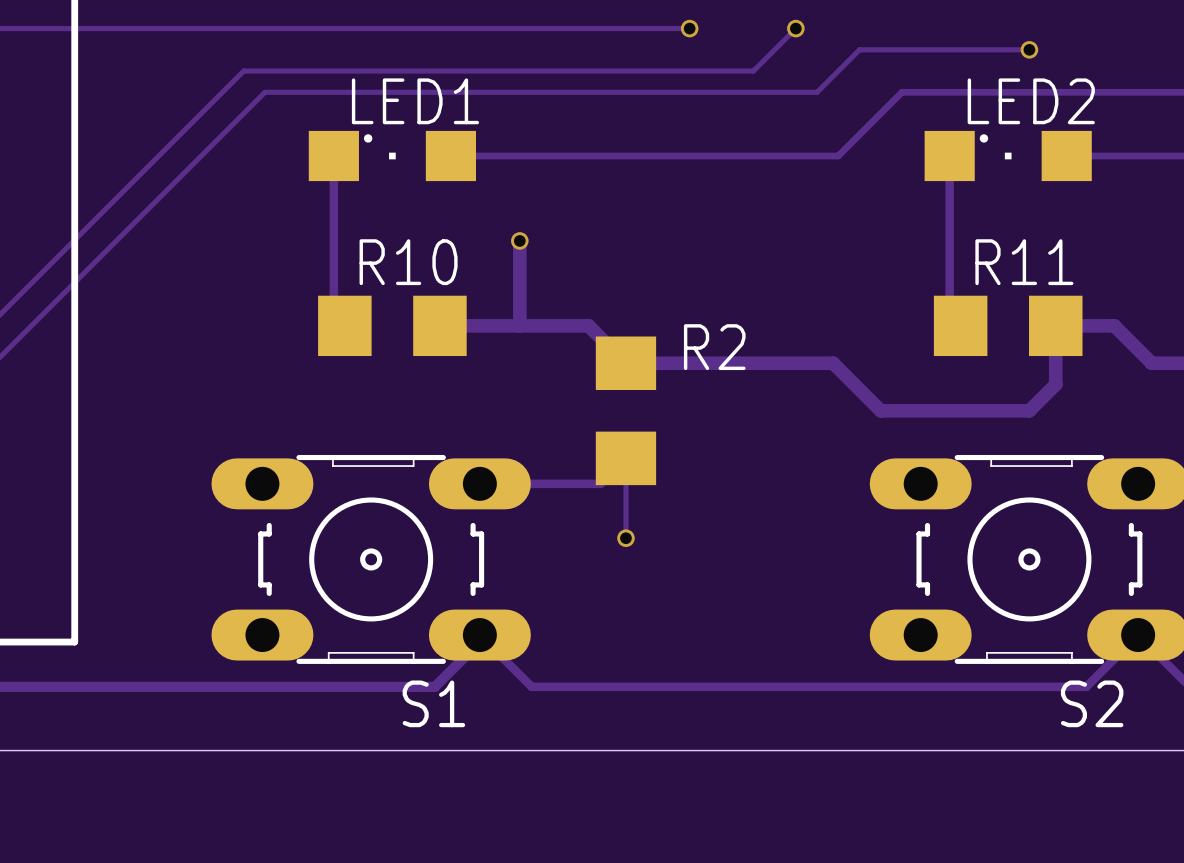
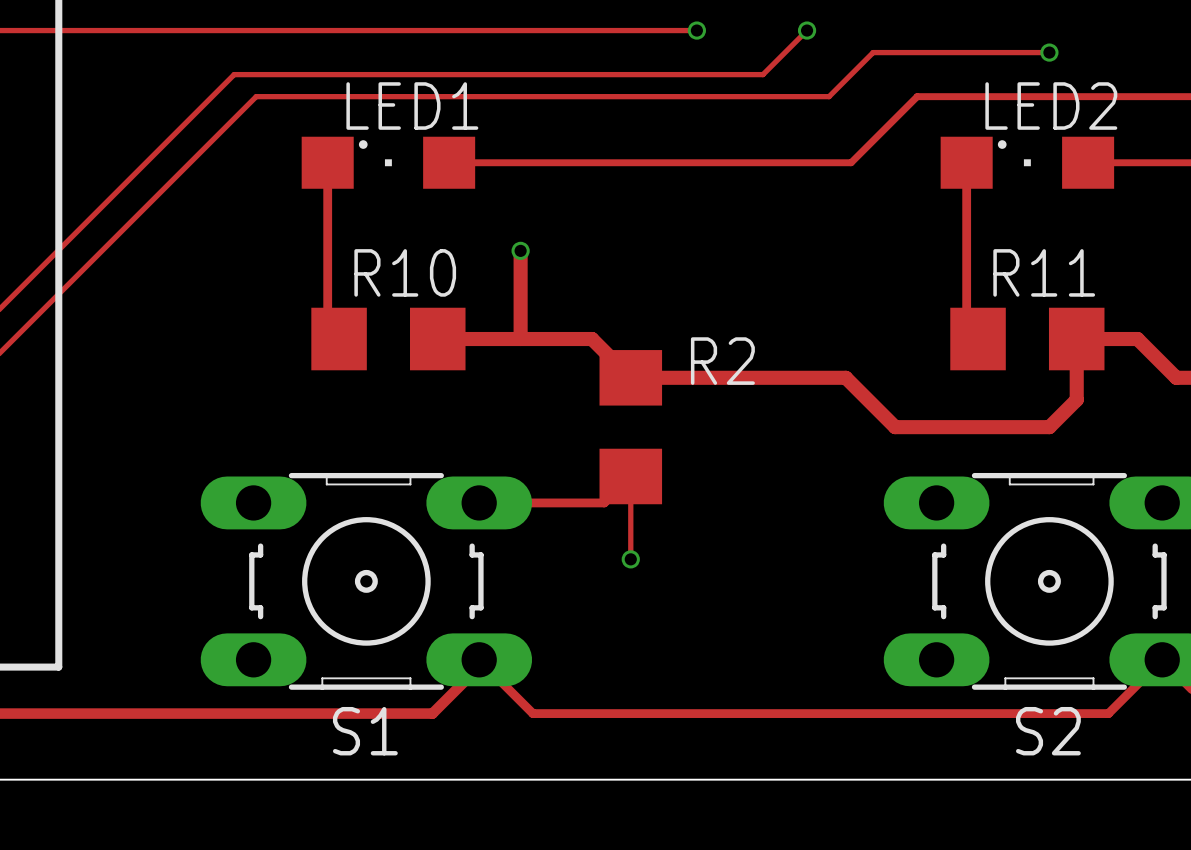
S1 name position: S1 (433, 703) -> S1 (365, 731)
S2 name position: S2 (1092, 703) -> S2 (1048, 731)

